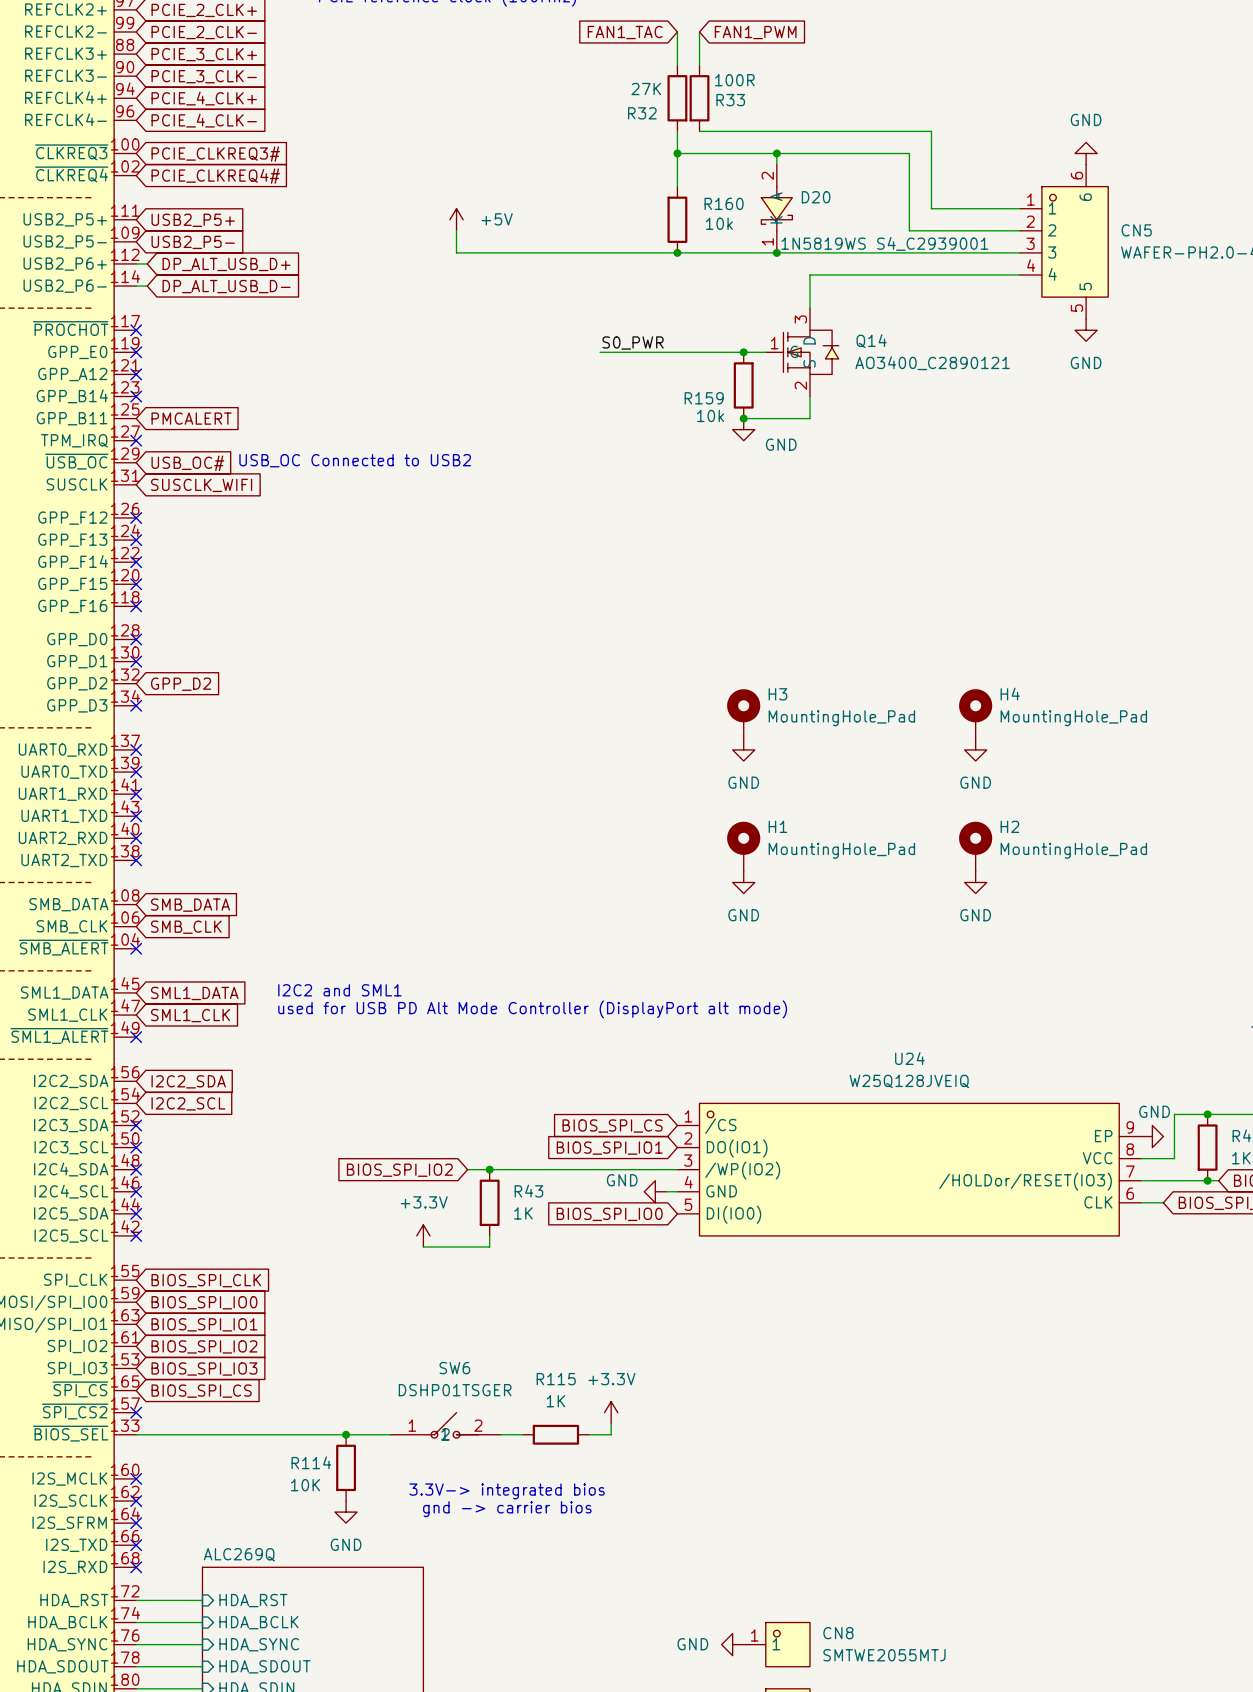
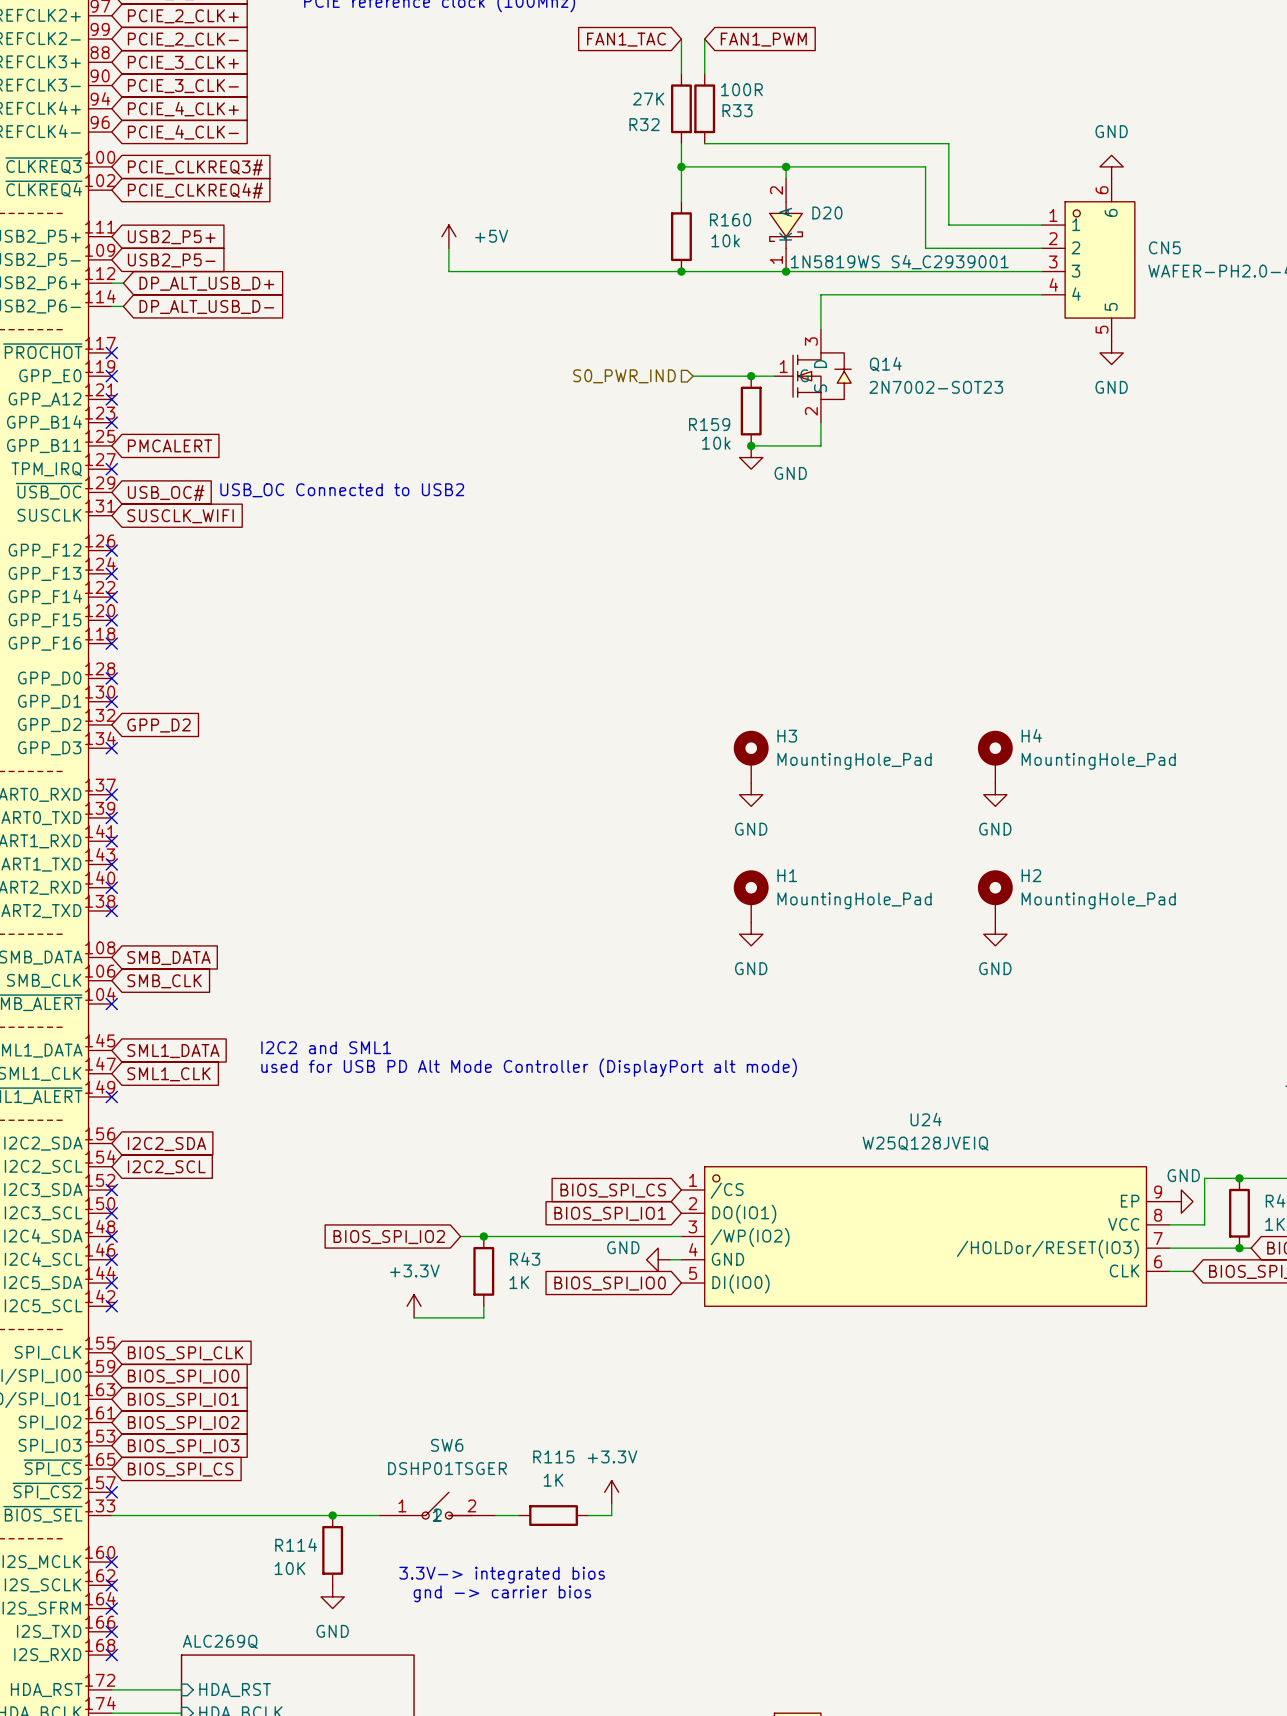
label: S0_PWR (633, 342) -> none
wire: (600, 352) (688, 352) -> none
hierarchical label: none -> S0_PWR_IND (624, 376)
Q14 value: AO3400_C2890121 (932, 363) -> 2N7002-SOT23 (936, 387)

